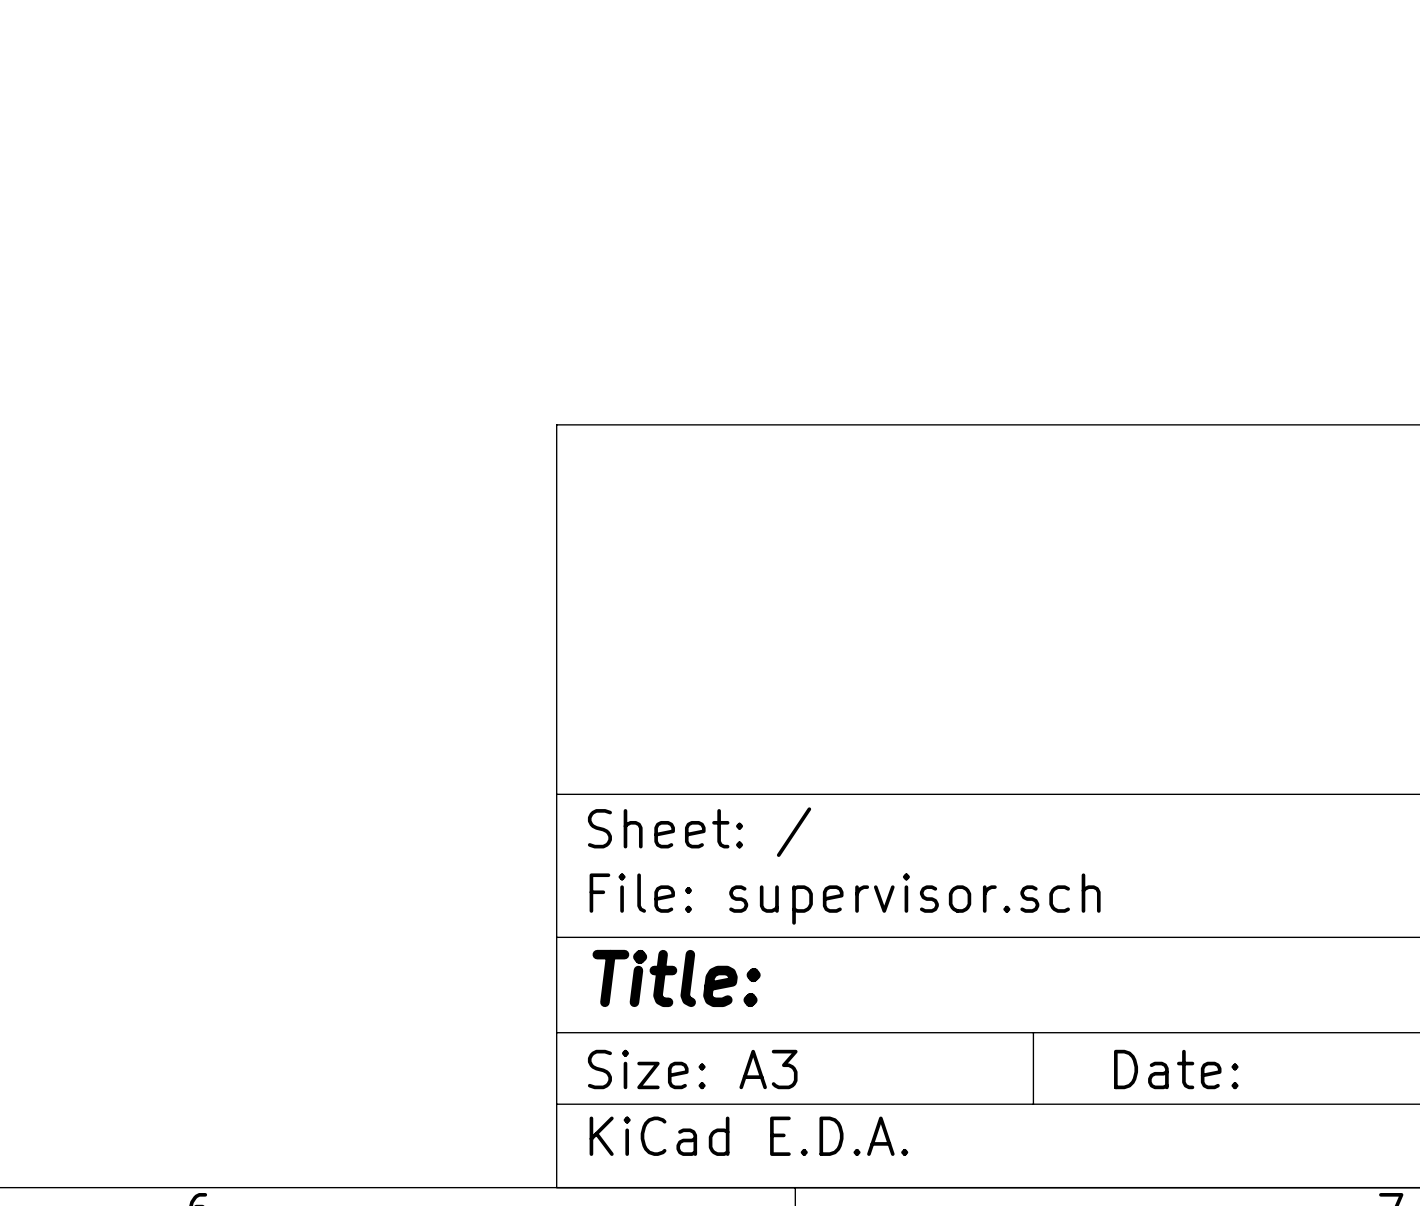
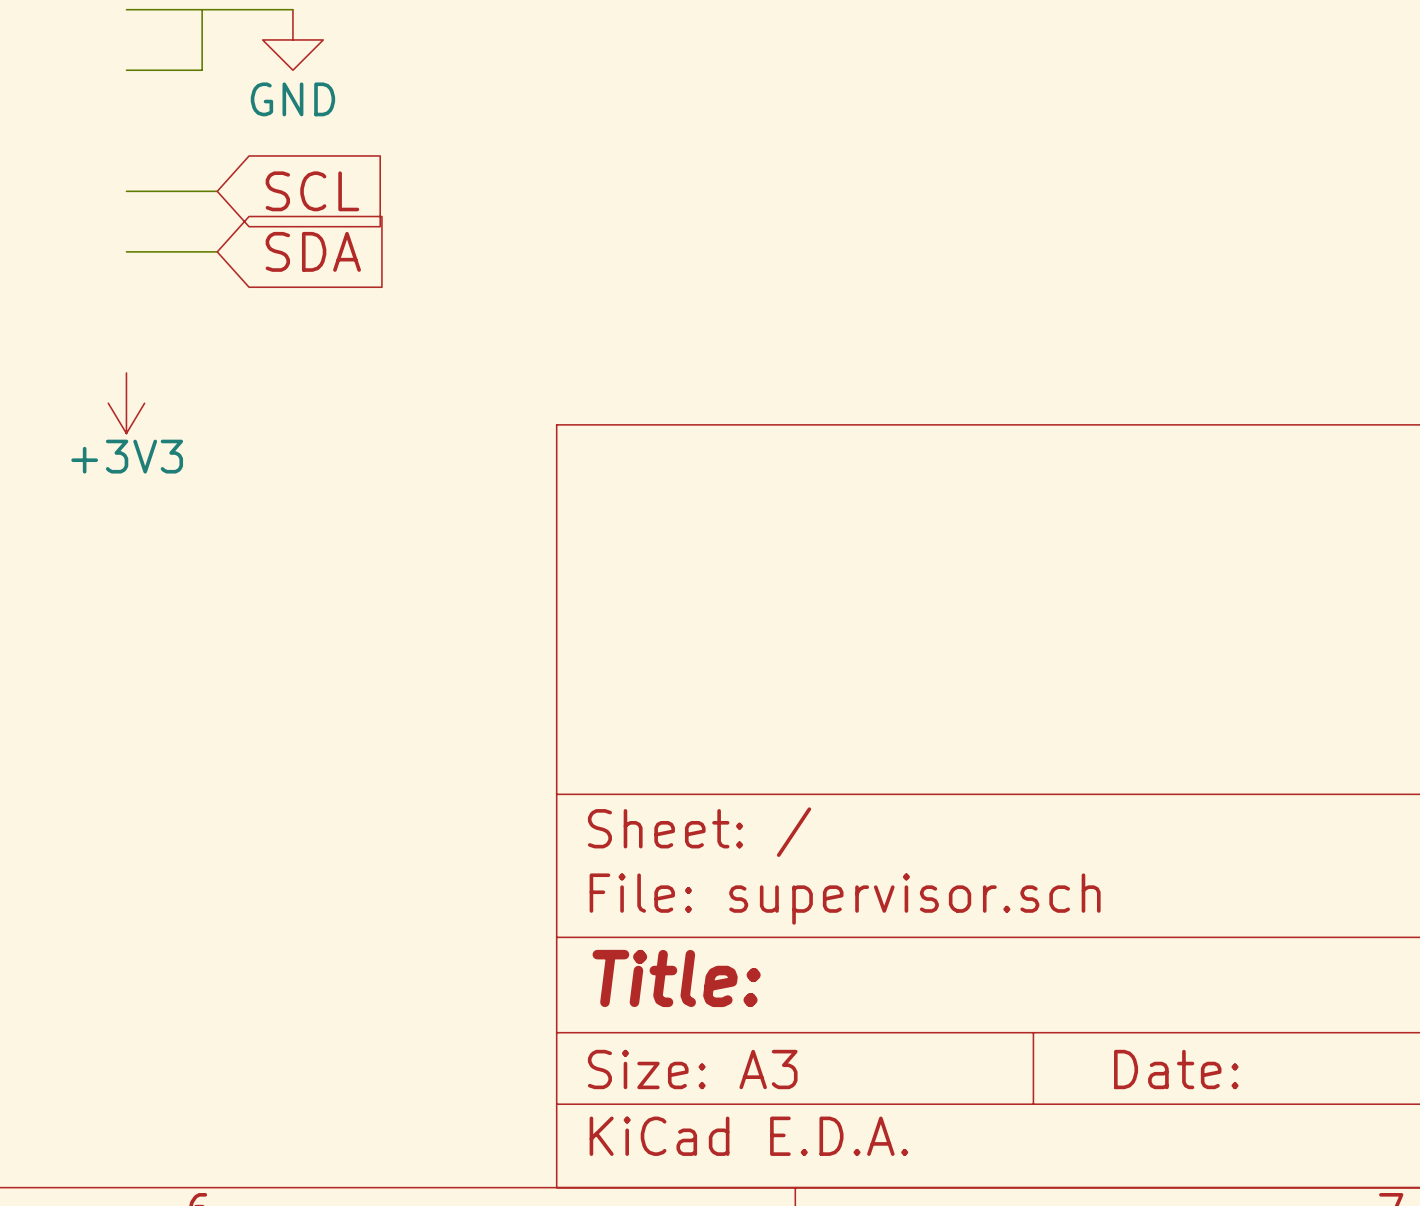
wire: none -> (126, 9) (292, 9)
wire: none -> (202, 9) (202, 70) (126, 70)
power symbol: none -> GND (292, 39)
wire: none -> (126, 191) (217, 191)
global label: none -> SCL (312, 191)
wire: none -> (126, 251) (217, 251)
global label: none -> SDA (313, 251)
power symbol: none -> +3V3 (126, 403)

